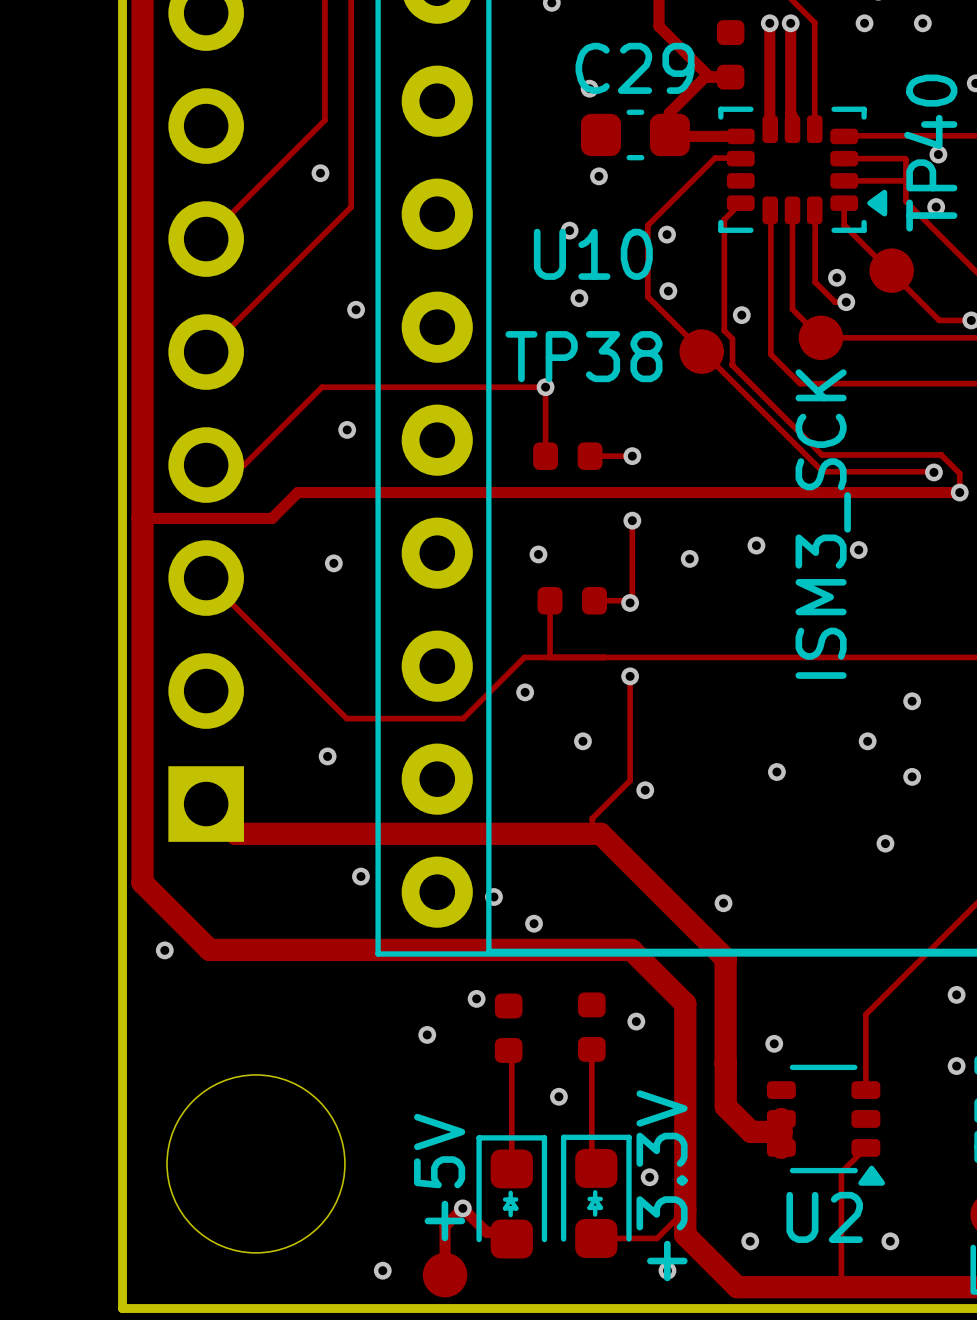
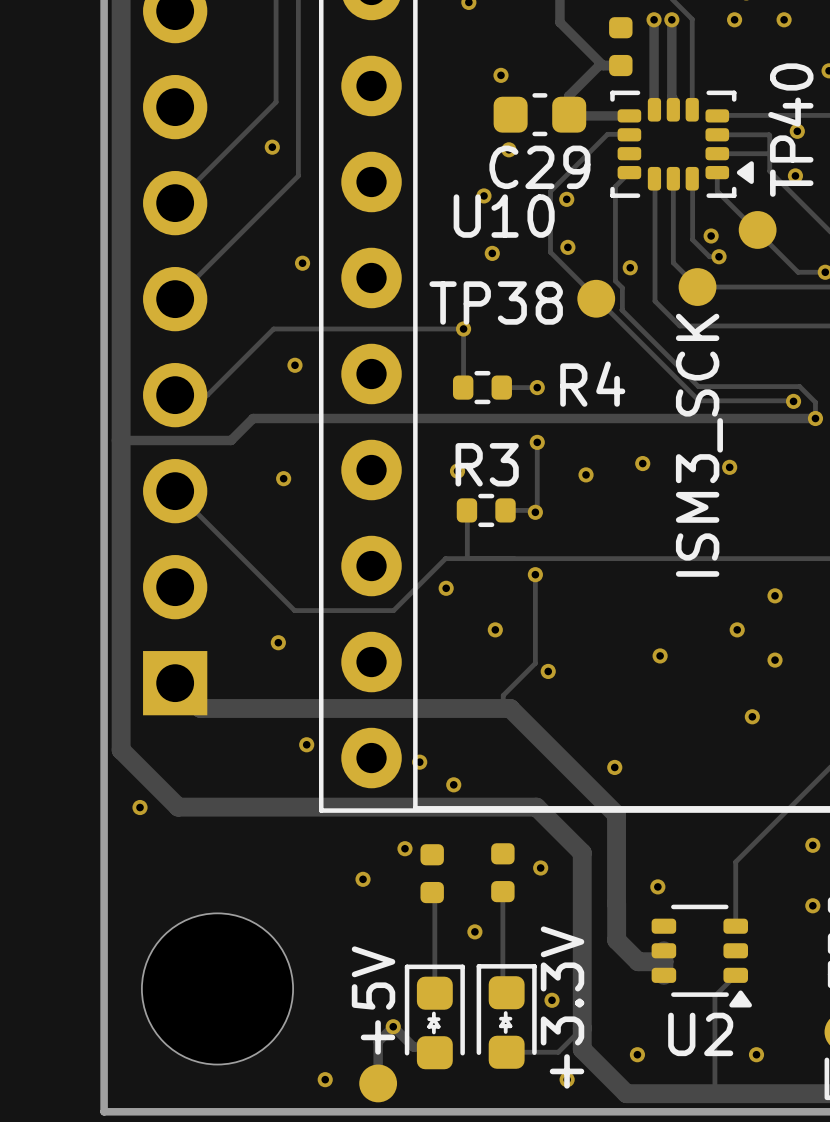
C29 name position: C29 (635, 68) -> C29 (539, 167)
part: (567, 456) -> none
R4: none -> (482, 387)
part: (572, 600) -> none
R3: none -> (486, 510)

